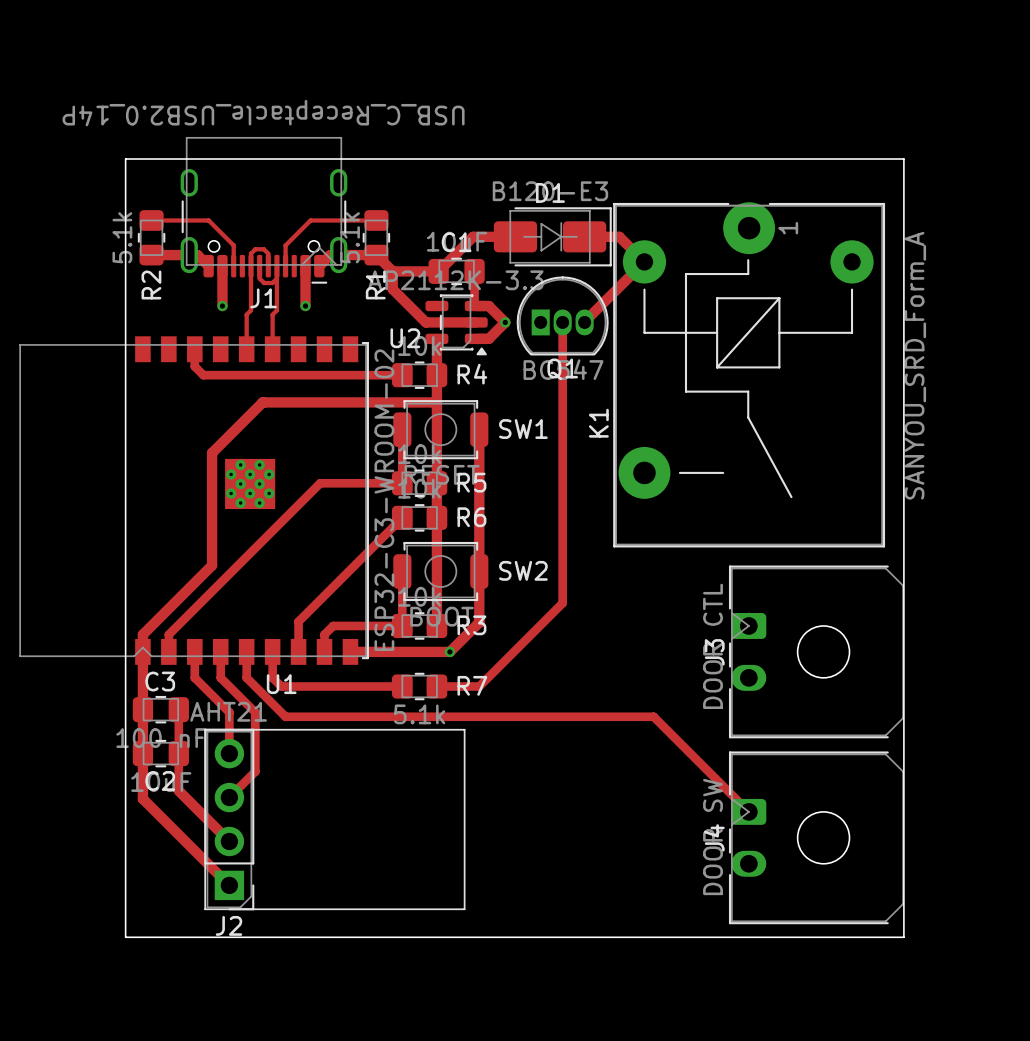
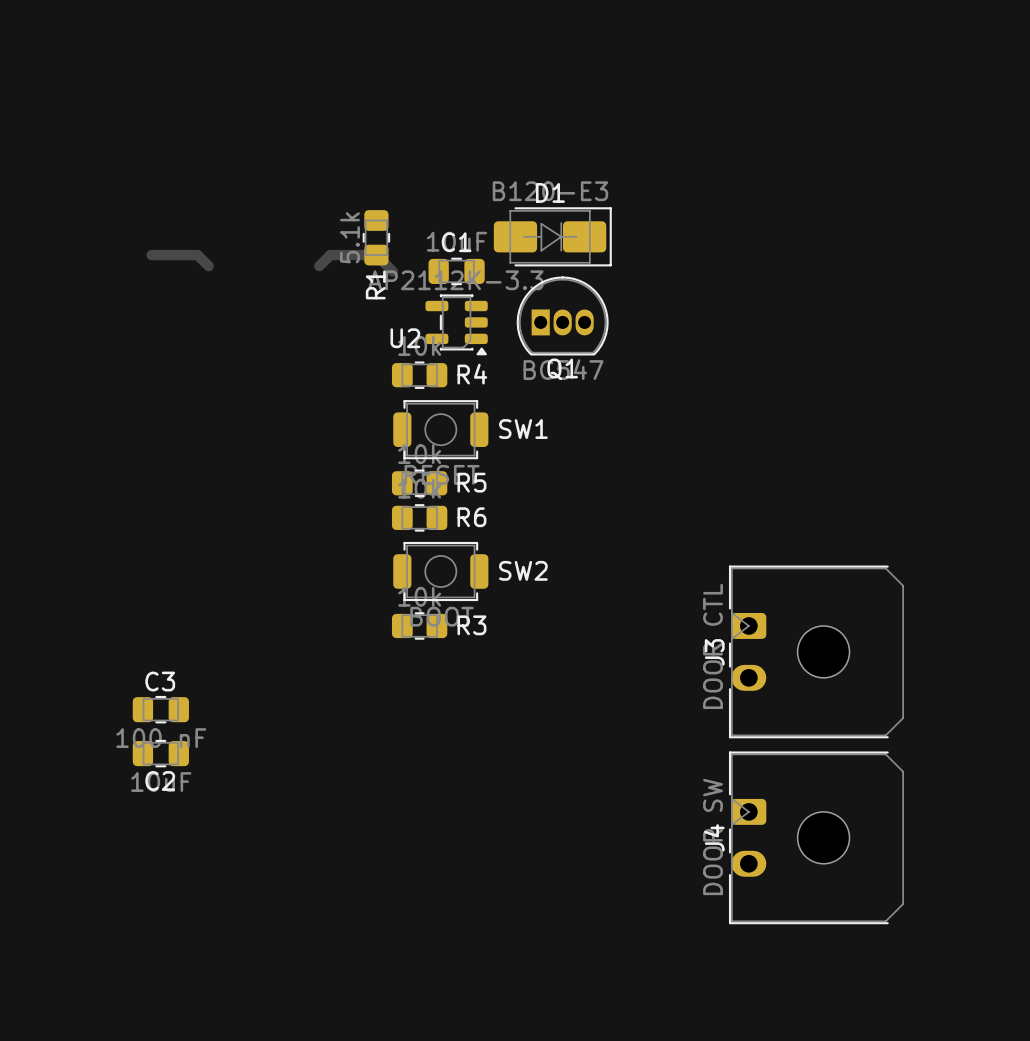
board edge: (125, 159) (903, 159) (903, 937) (125, 937) (125, 159) -> none
J1: USB_C_Receptacle_USB2.0_14P (263, 210) -> none
track: (151, 220) (208, 220) (233, 245) (233, 266) -> none
track: (376, 220) (310, 220) (285, 245) (285, 266) -> none
track: (515, 236) (473, 236) (438, 271) (392, 271) (392, 289) (425, 322) (476, 322) -> none
track: (584, 236) (619, 236) (644, 261) (584, 322) -> none
R2: 5.1k (151, 237) -> none
track: (222, 266) (222, 306) -> none
track: (259, 266) (259, 278) (264, 283) (272, 283) (276, 278) -> none
track: (268, 266) (268, 253) (263, 249) (255, 249) (251, 253) (251, 310) (246, 314) (246, 349) -> none
track: (276, 266) (276, 310) (272, 314) (272, 349) -> none
track: (305, 266) (305, 306) -> none
track: (474, 271) (474, 304) (476, 306) (488, 306) (505, 322) (488, 338) (476, 338) -> none
via: (222, 306) -> none
via: (305, 306) -> none
via: (505, 322) -> none
track: (562, 322) (562, 603) (479, 686) (436, 686) -> none
track: (436, 338) (436, 625) -> none
track: (194, 354) (194, 349) (194, 366) (203, 375) (402, 375) -> none
K1: SANYOU_SRD_Form_A (749, 374) -> none
track: (436, 402) (262, 402) (212, 453) (212, 565) (142, 634) (142, 798) (229, 885) -> none
track: (402, 429) (402, 483) (320, 483) (168, 634) (168, 651) -> none
track: (479, 429) (479, 622) (449, 651) (350, 651) -> none
U1: ESP32-C3-WROOM-02 (194, 500) -> none
track: (402, 517) (298, 621) (298, 651) -> none
track: (402, 571) (402, 625) (333, 625) (324, 634) (324, 651) -> none
track: (220, 651) (220, 677) (255, 712) (255, 771) (229, 797) -> none
track: (246, 651) (246, 677) (285, 716) (653, 716) (748, 811) -> none
track: (272, 651) (272, 677) (281, 686) (402, 686) -> none
via: (449, 651) -> none
track: (196, 653) (194, 651) (194, 677) (229, 712) (229, 753) -> none
R7: 5.1k (419, 686) -> none
track: (178, 709) (178, 790) (229, 841) -> none
line: (205, 729) (464, 729) (464, 909) (205, 909) (205, 729) -> none
J2: AHT21 (229, 819) -> none

